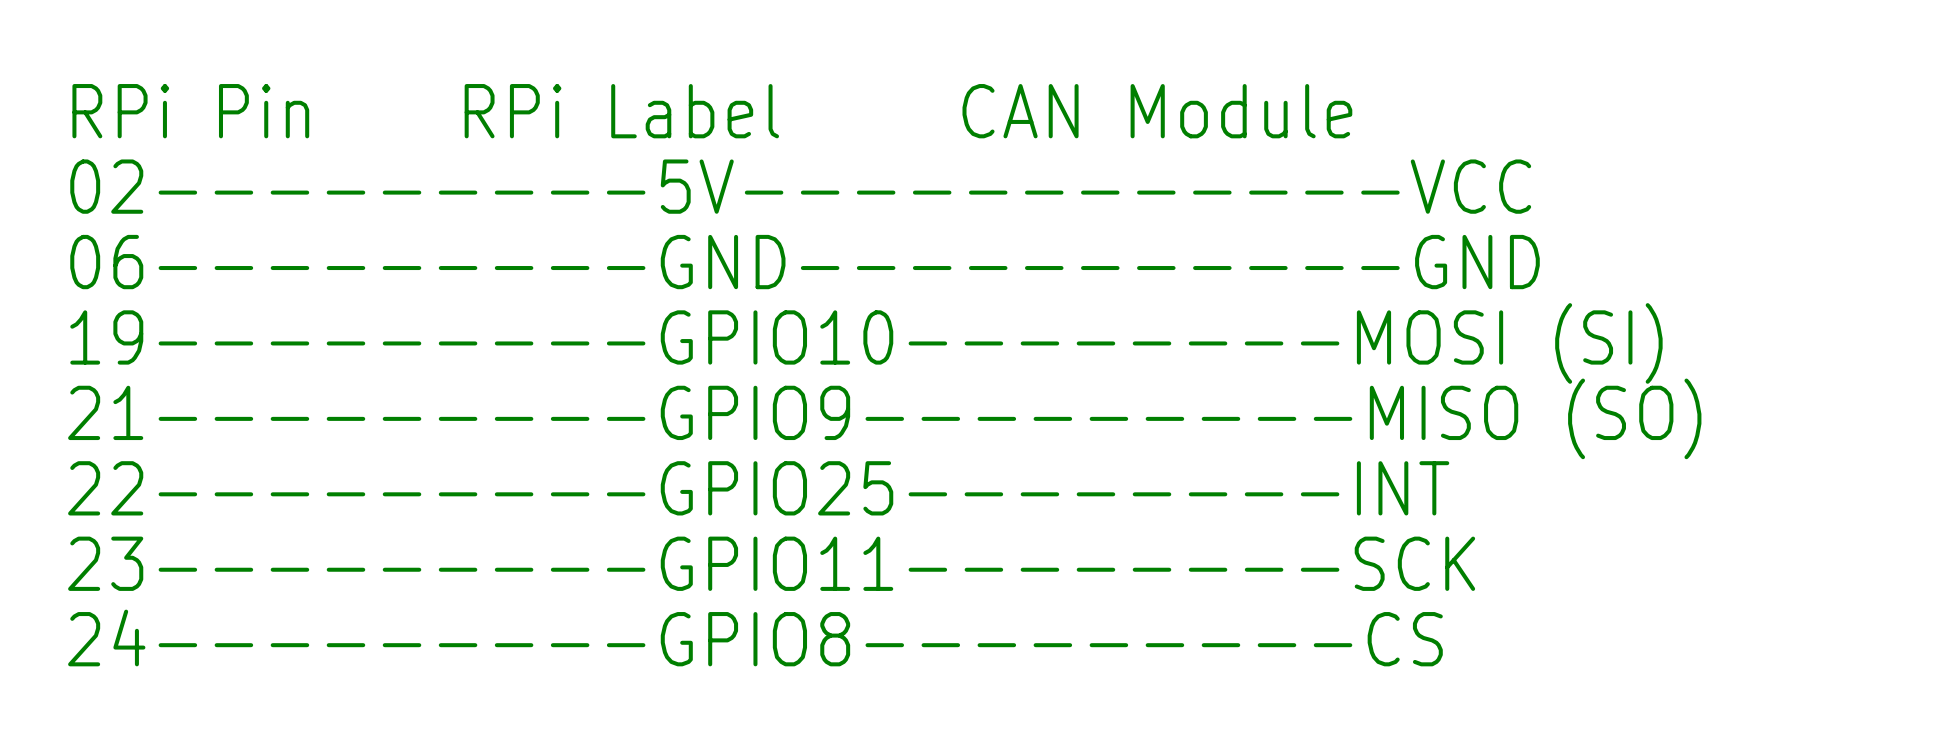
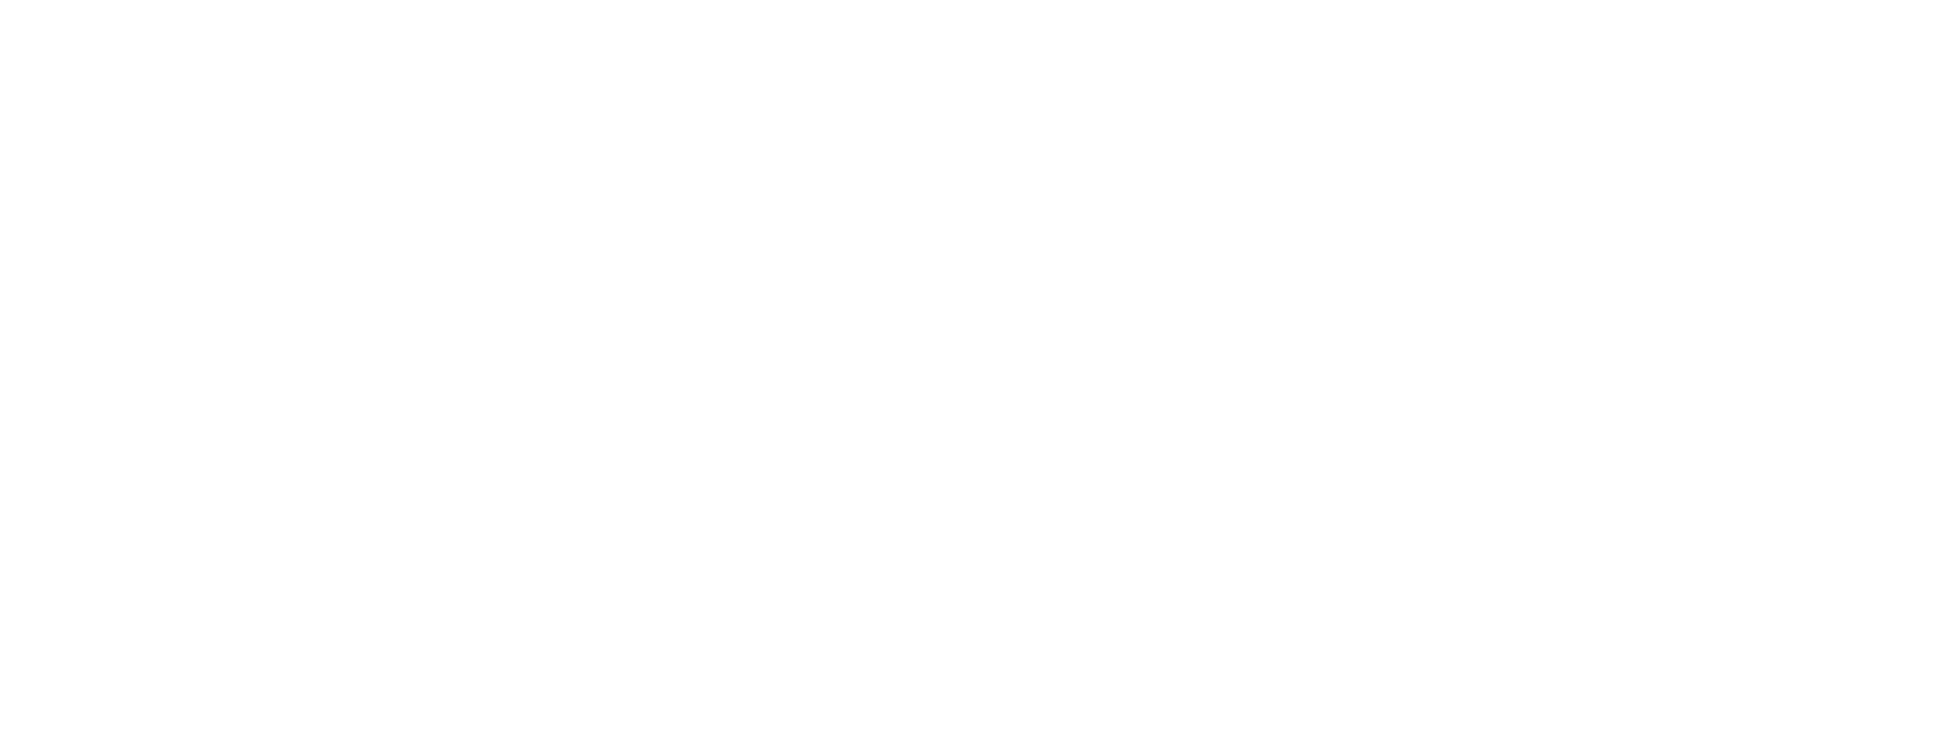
text: RPi Pin RPi Label CAN Module (712, 111) -> none
text: 02---------5V------------VCC (800, 186) -> none
text: 06---------GND-----------GND (805, 262) -> none
text: 19---------GPIO10--------MOSI (SI) (866, 343) -> none
text: 21---------GPIO9---------MISO (SO) (884, 418) -> none
text: 22---------GPIO25--------INT (758, 488) -> none
text: 23---------GPIO11--------SCK (771, 563) -> none
text: 24---------GPIO8---------CS (755, 637) -> none

